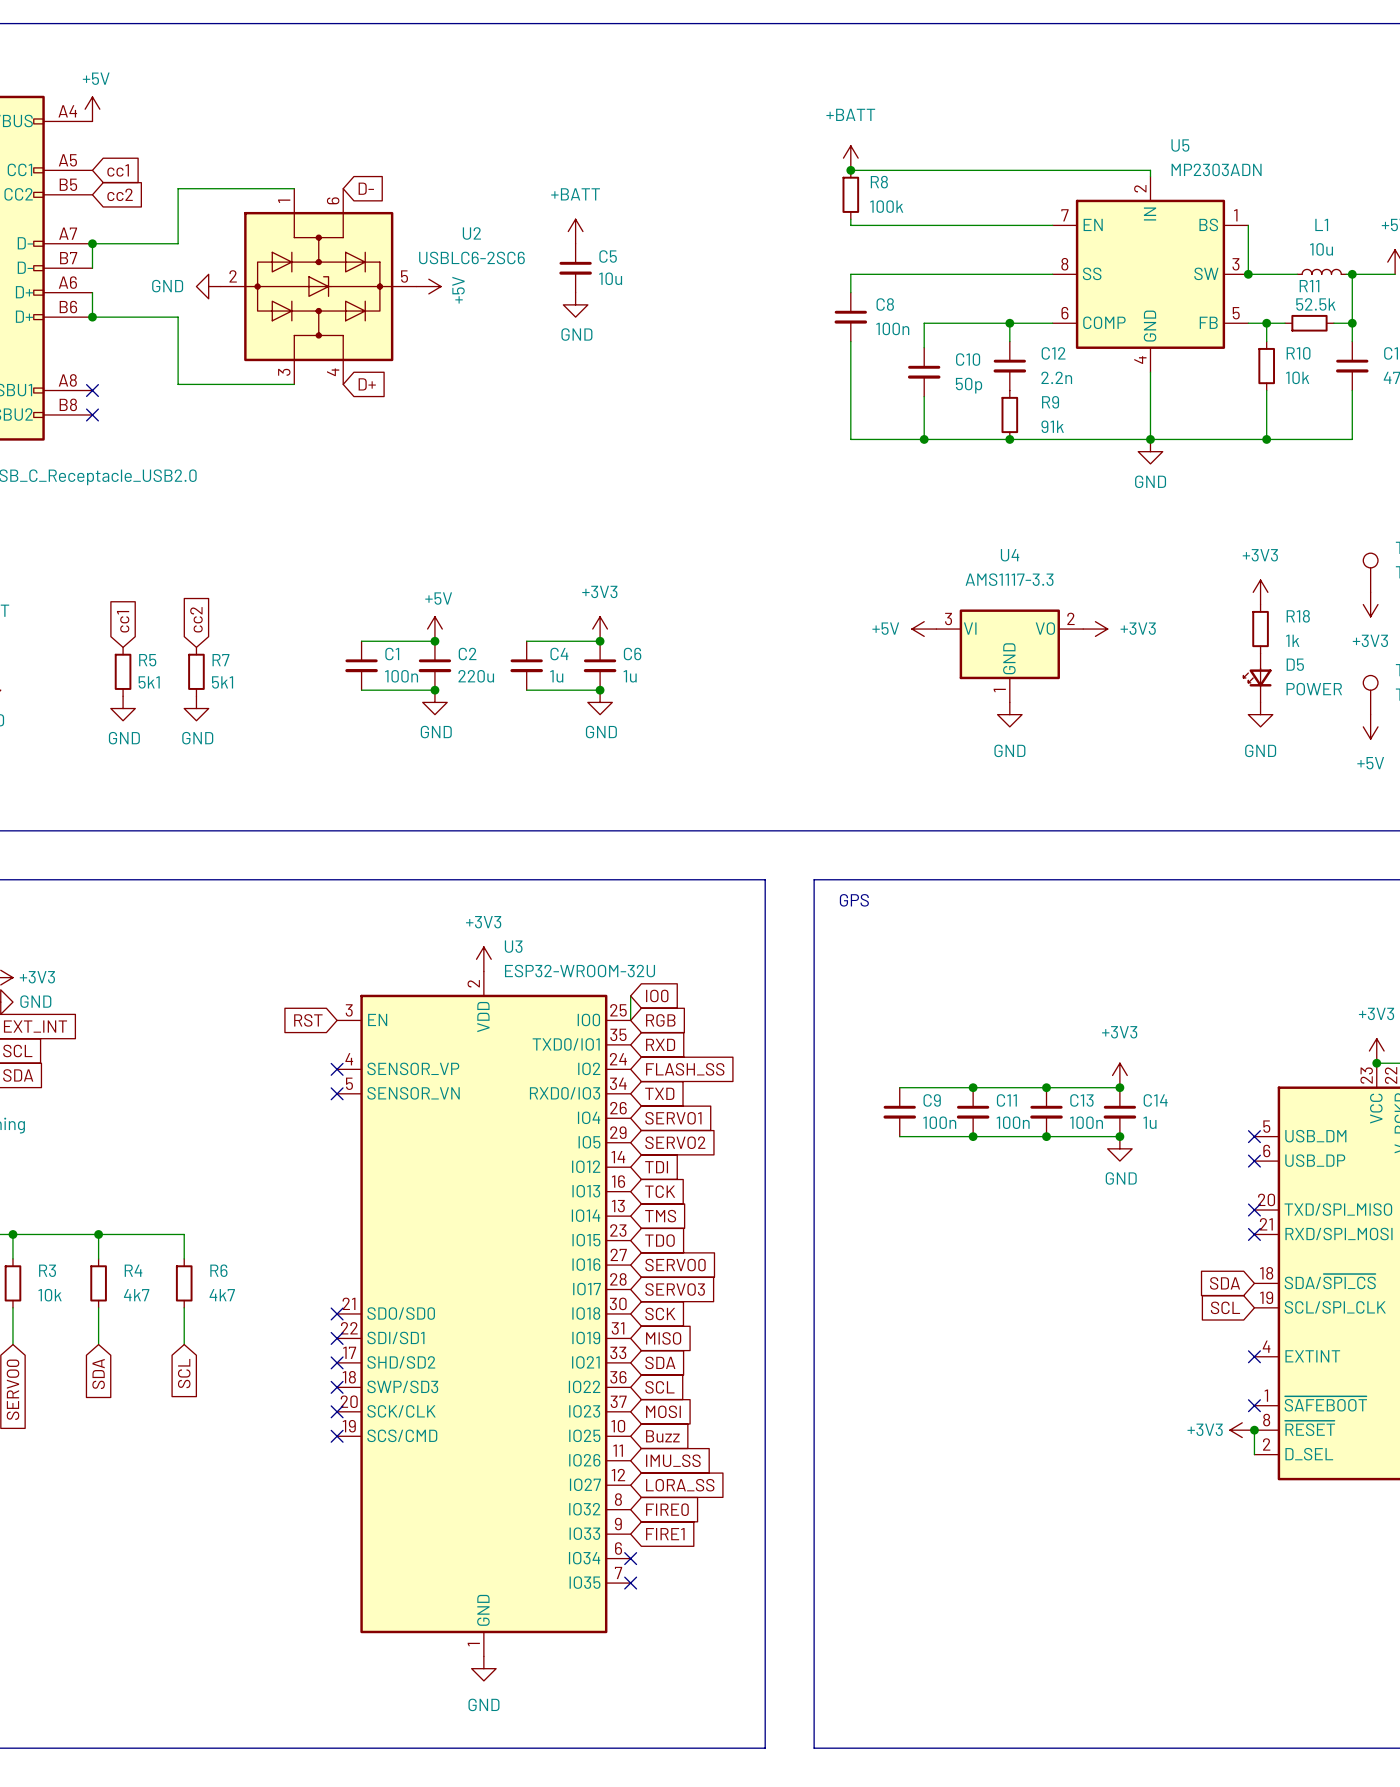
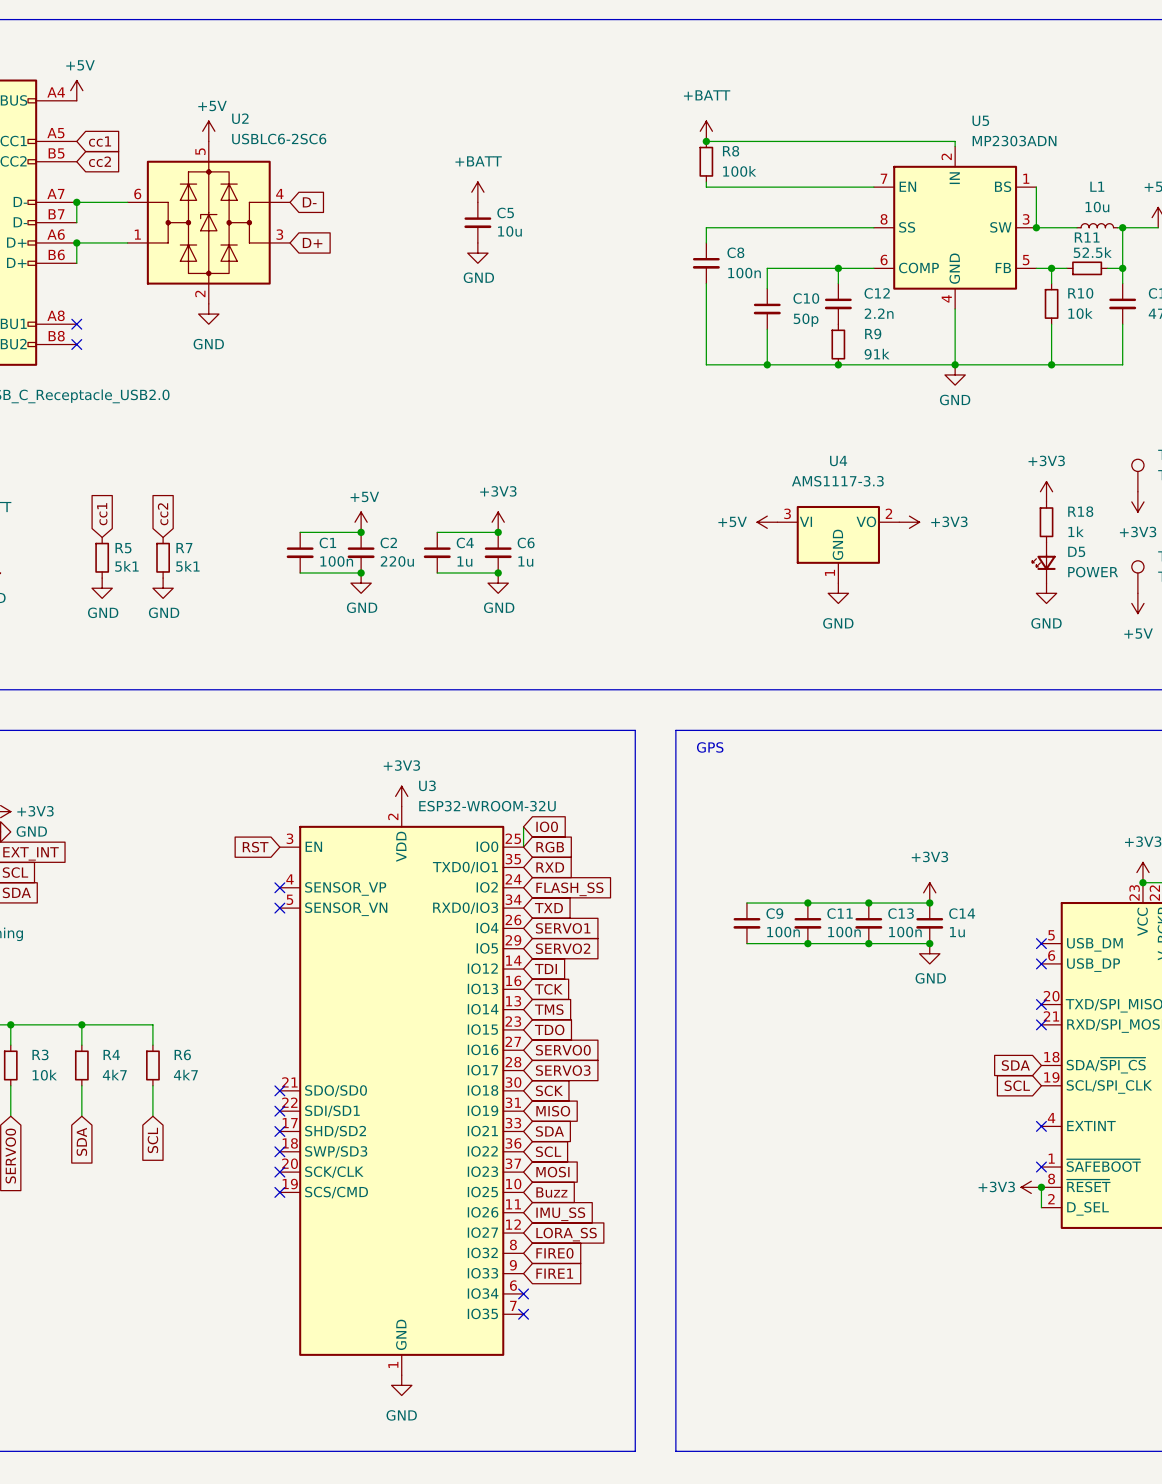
wire: (294, 188) (178, 188) (178, 243) (153, 243) -> none
global label position: D- (366, 188) -> D- (309, 202)
U2 name position: U2 (471, 233) -> U2 (240, 118)
U2 value position: USBLC6-2SC6 (471, 257) -> USBLC6-2SC6 (279, 139)
power symbol rotation: 0° (208, 286) -> 90° counterclockwise (208, 314)
power symbol position: GND (208, 286) -> GND (208, 314)
U2 rotation: 0° (318, 286) -> 90° counterclockwise (208, 222)
power symbol rotation: 0° (428, 286) -> 90° counterclockwise (208, 131)
power symbol position: +5V (428, 286) -> +5V (208, 131)
wire: none -> (76, 242) (127, 242)
wire: (92, 317) (178, 317) (178, 384) (294, 384) -> none
junction position: (92, 317) -> (76, 242)
global label position: D+ (367, 384) -> D+ (312, 242)

